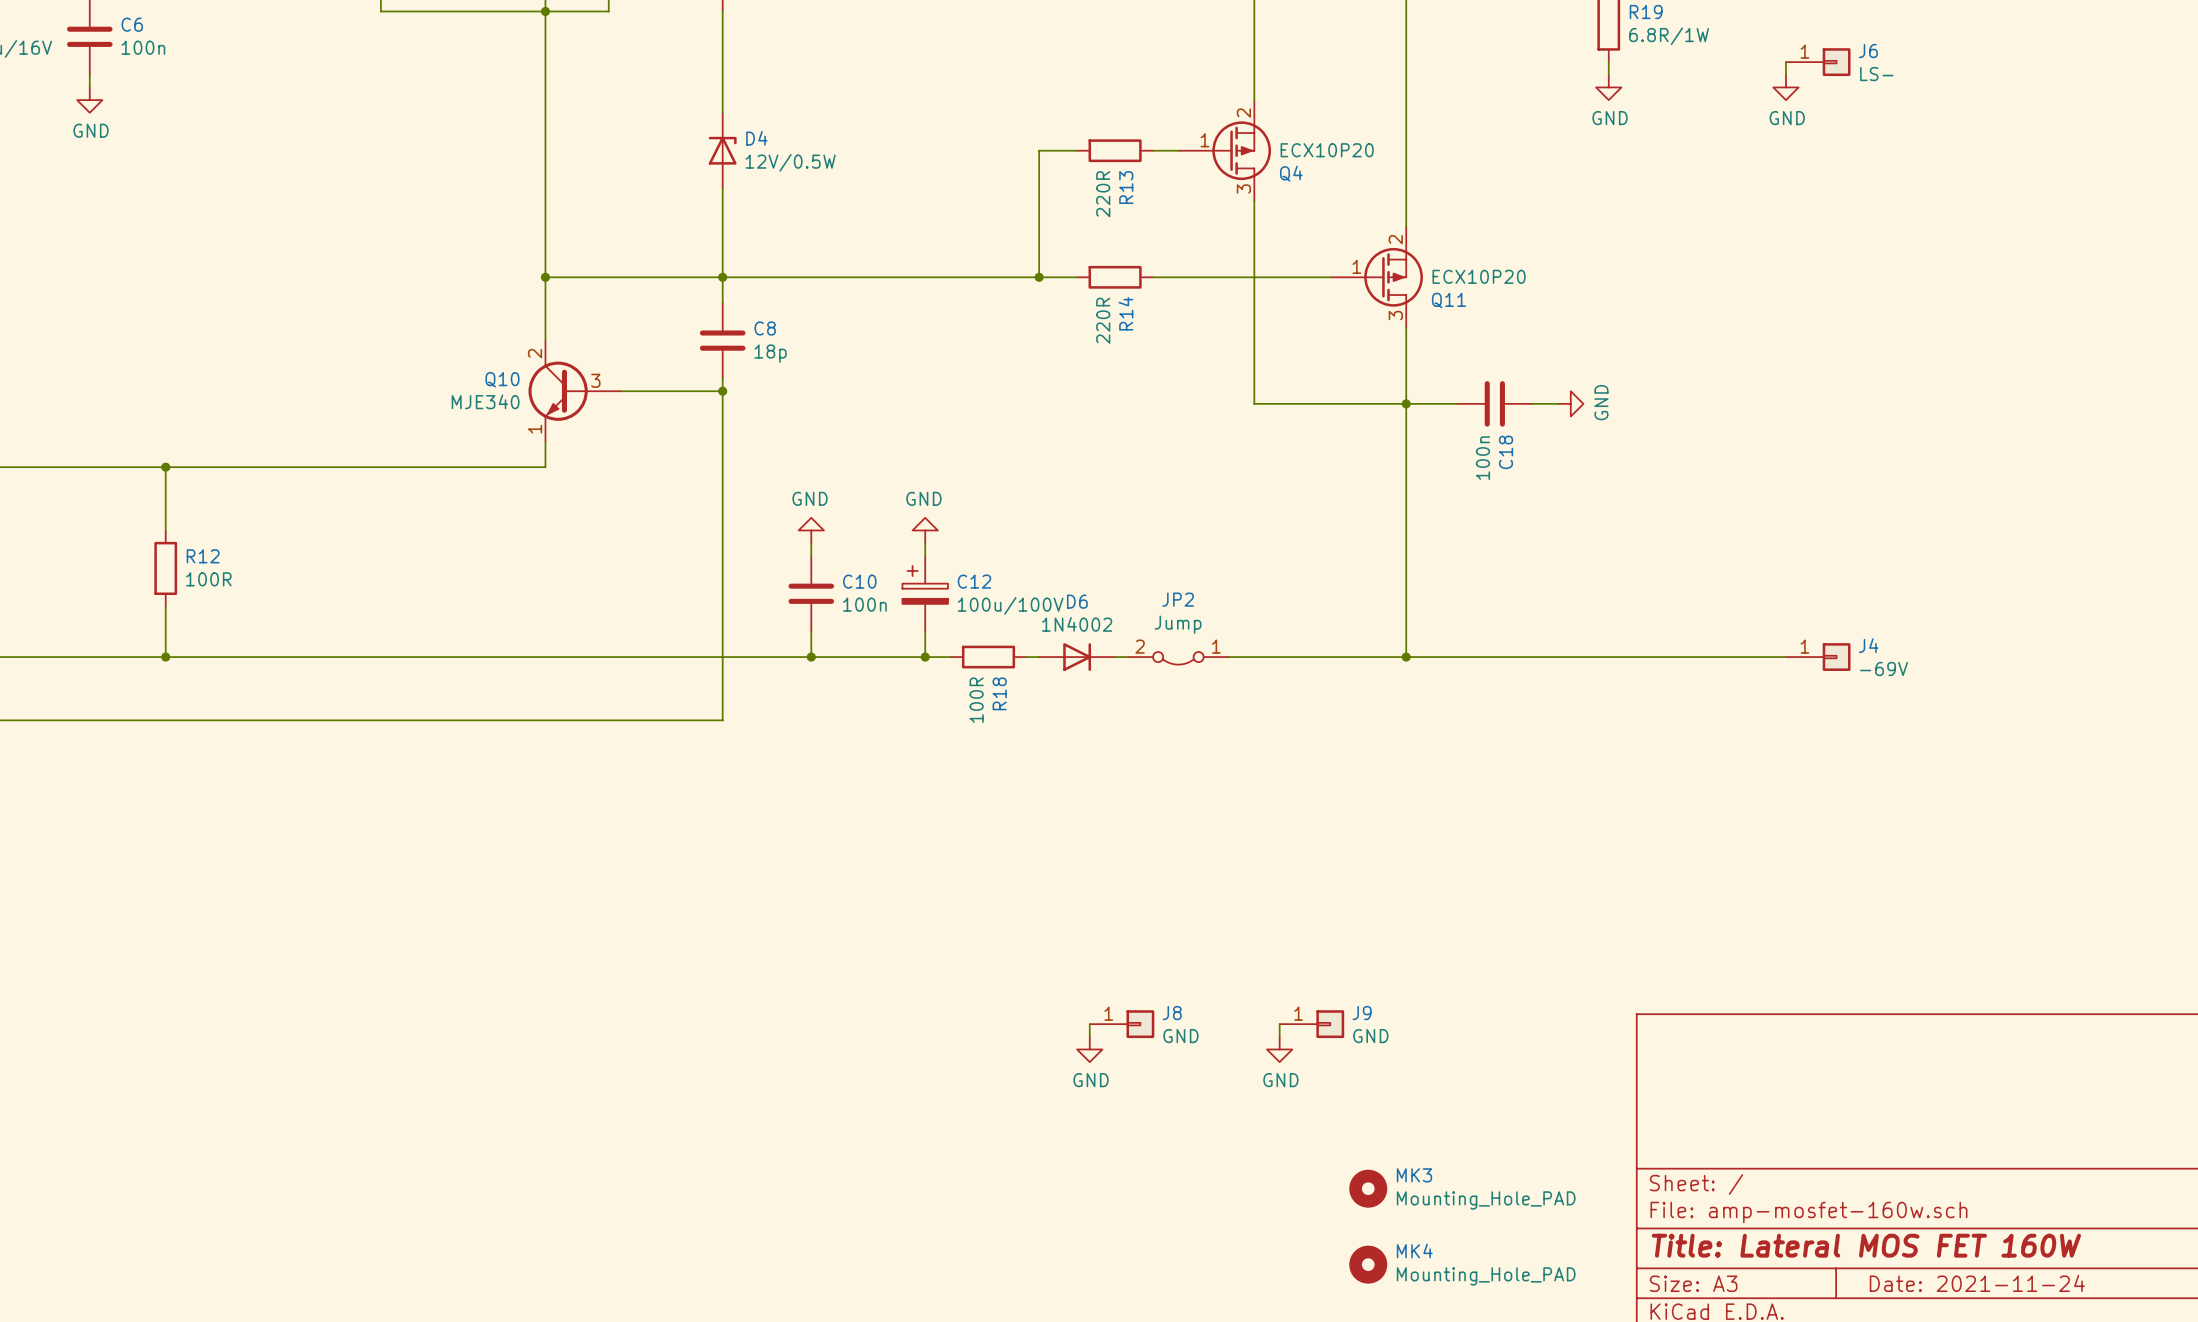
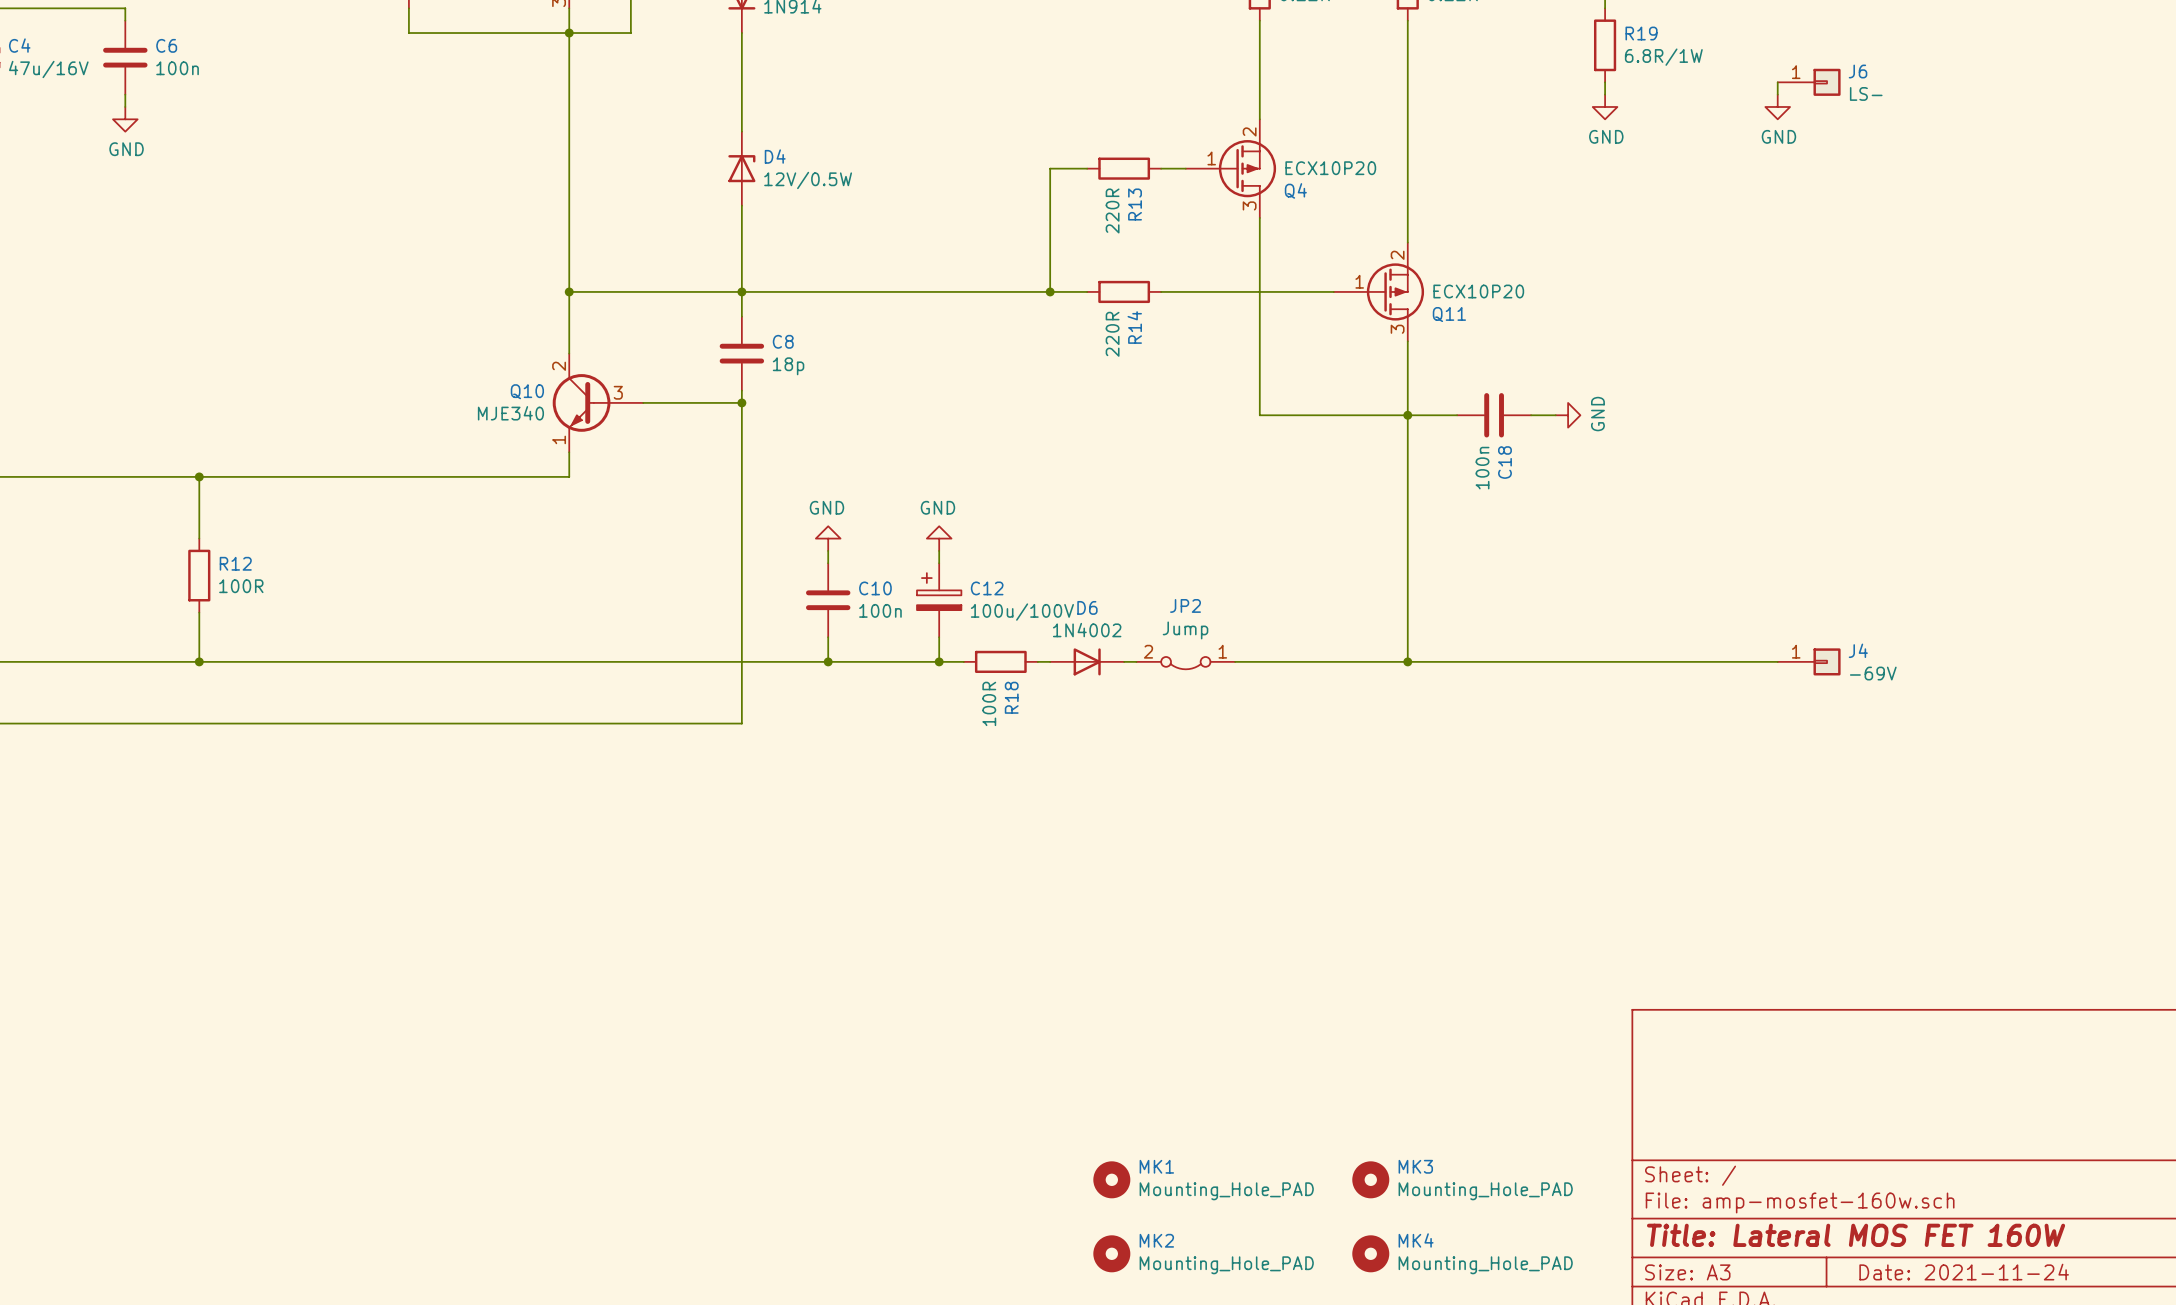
wire: (1089, 1024) (1089, 1036) -> none
J8: GND (1122, 1024) -> none
wire: (1279, 1024) (1279, 1036) -> none
J9: GND (1311, 1024) -> none
power symbol: GND (1089, 1049) -> none
power symbol: GND (1279, 1049) -> none
MK1: none -> Mounting_Hole_PAD (1111, 1179)
MK2: none -> Mounting_Hole_PAD (1111, 1253)

